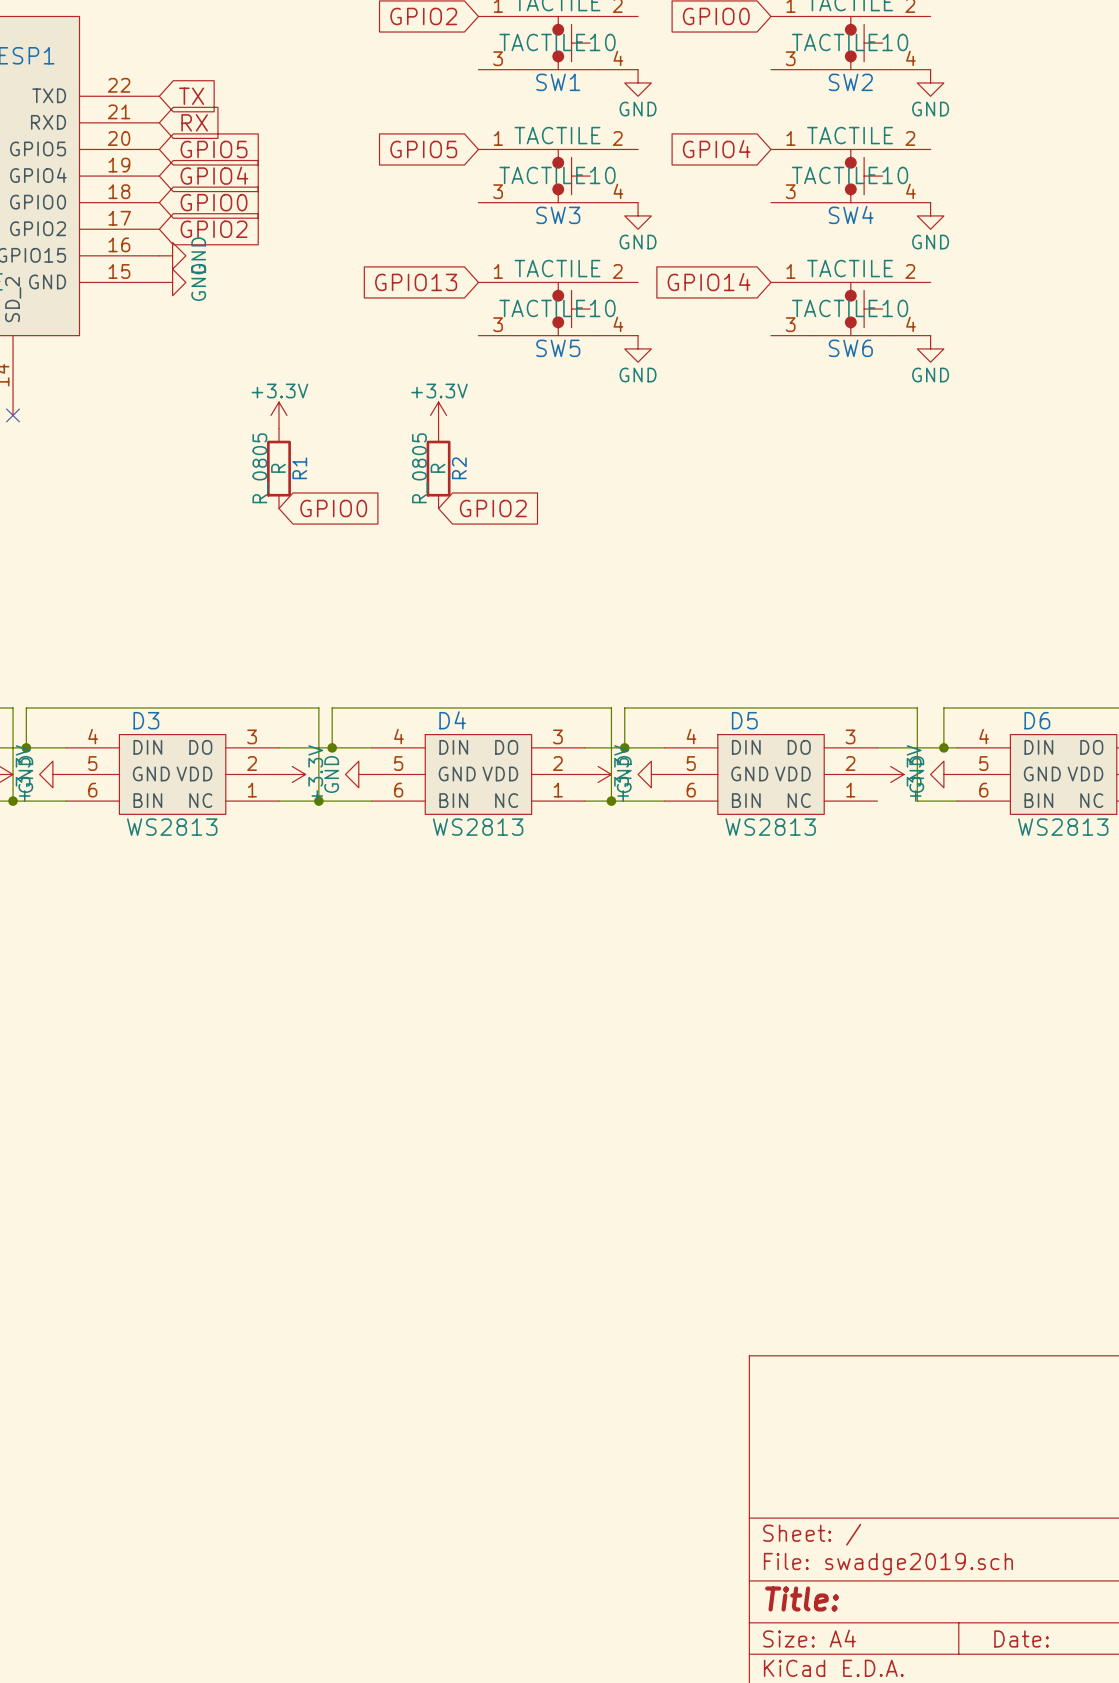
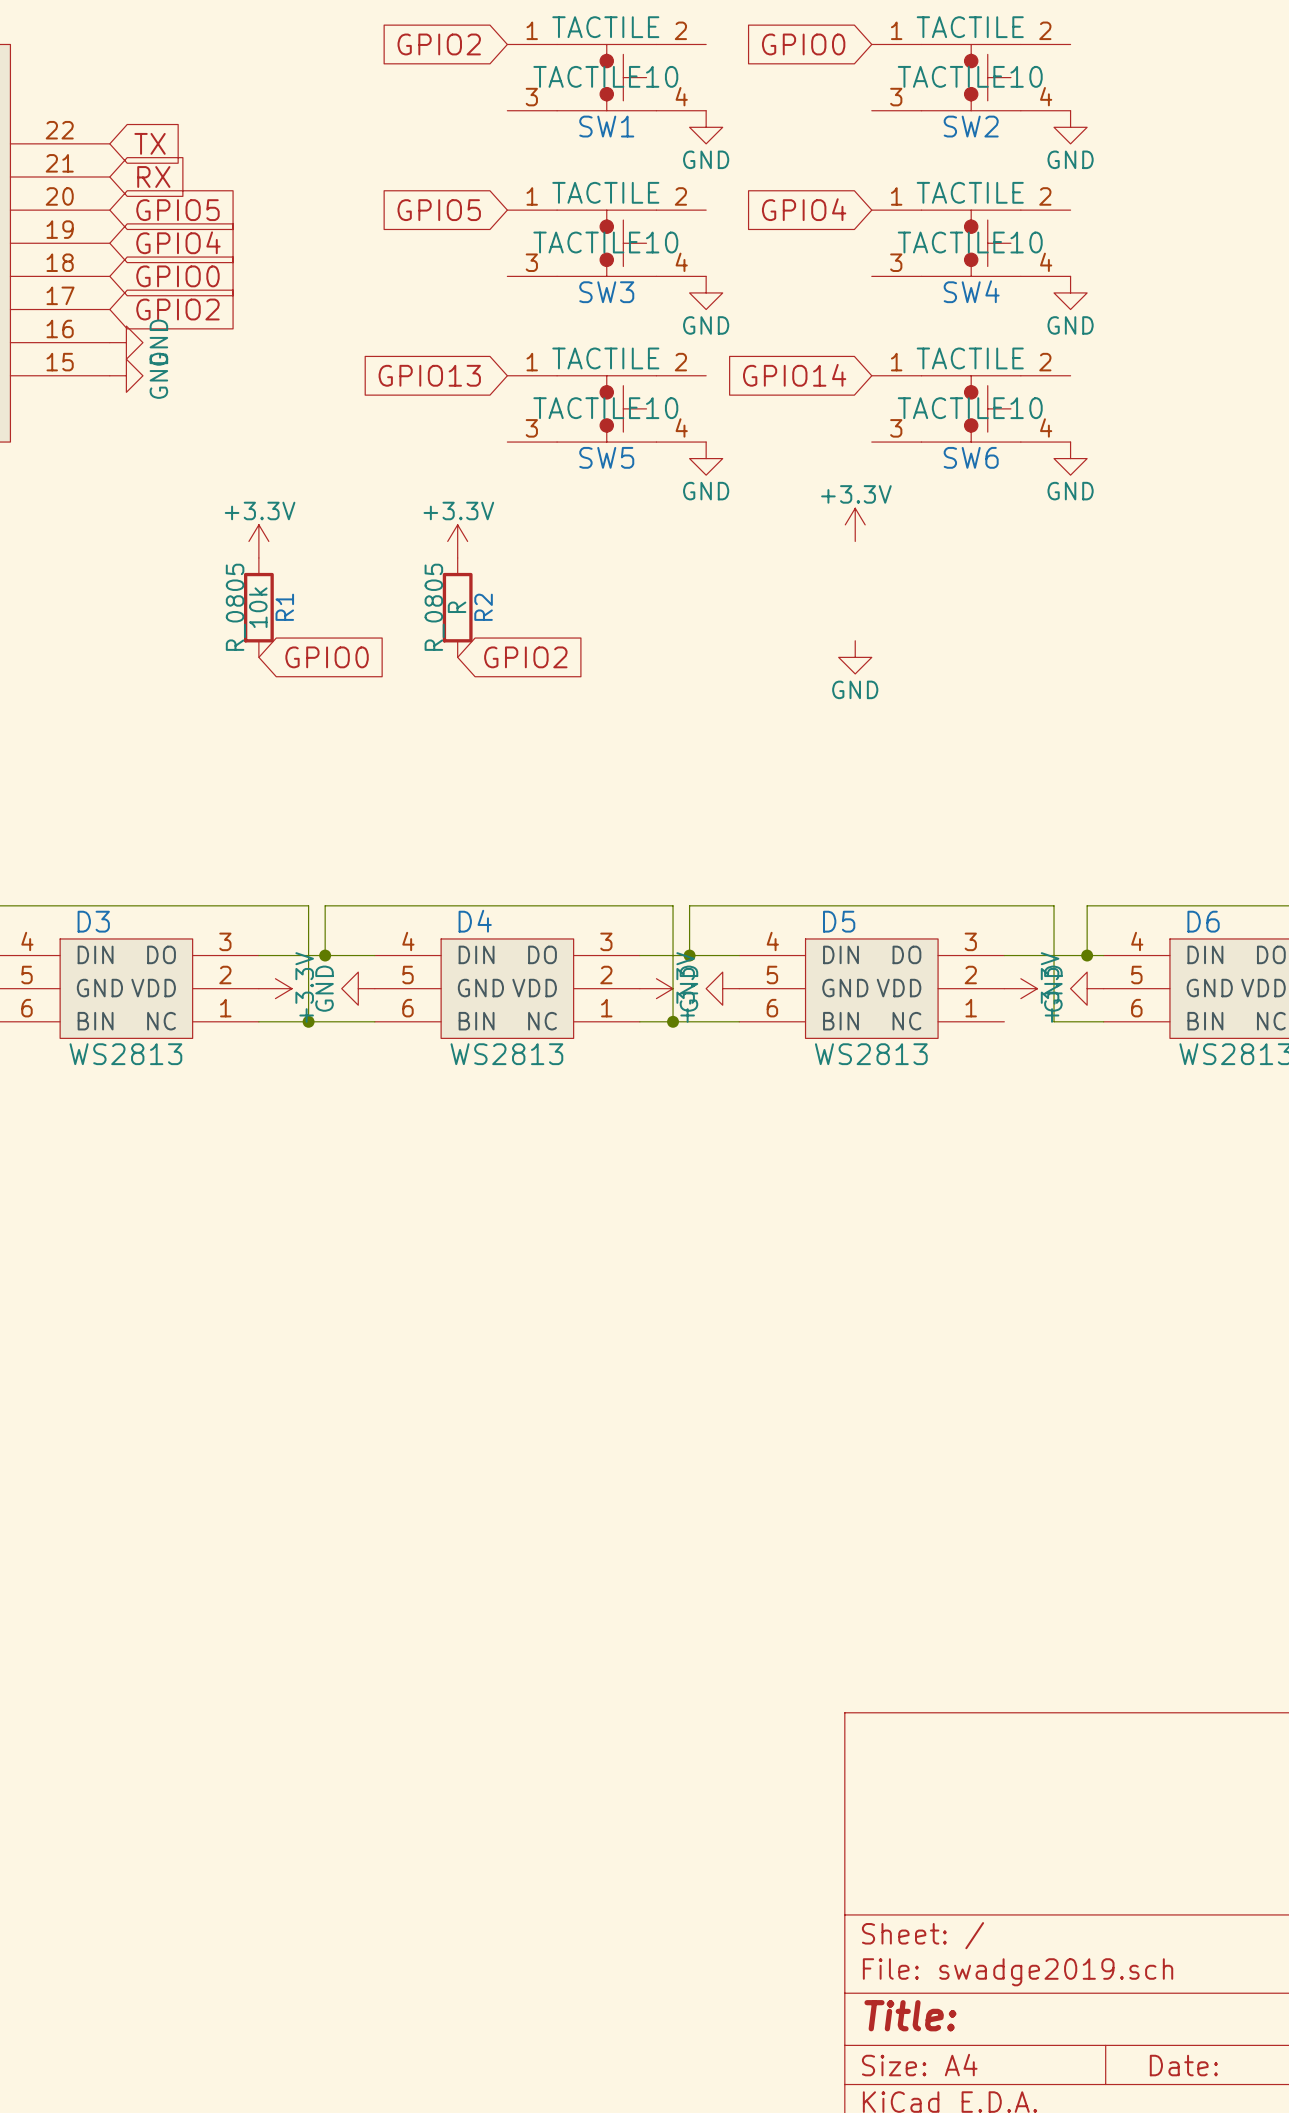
power symbol: none -> +3.3V (855, 524)
R1 value: R (278, 468) -> 10k (258, 607)
power symbol: none -> GND (855, 657)

